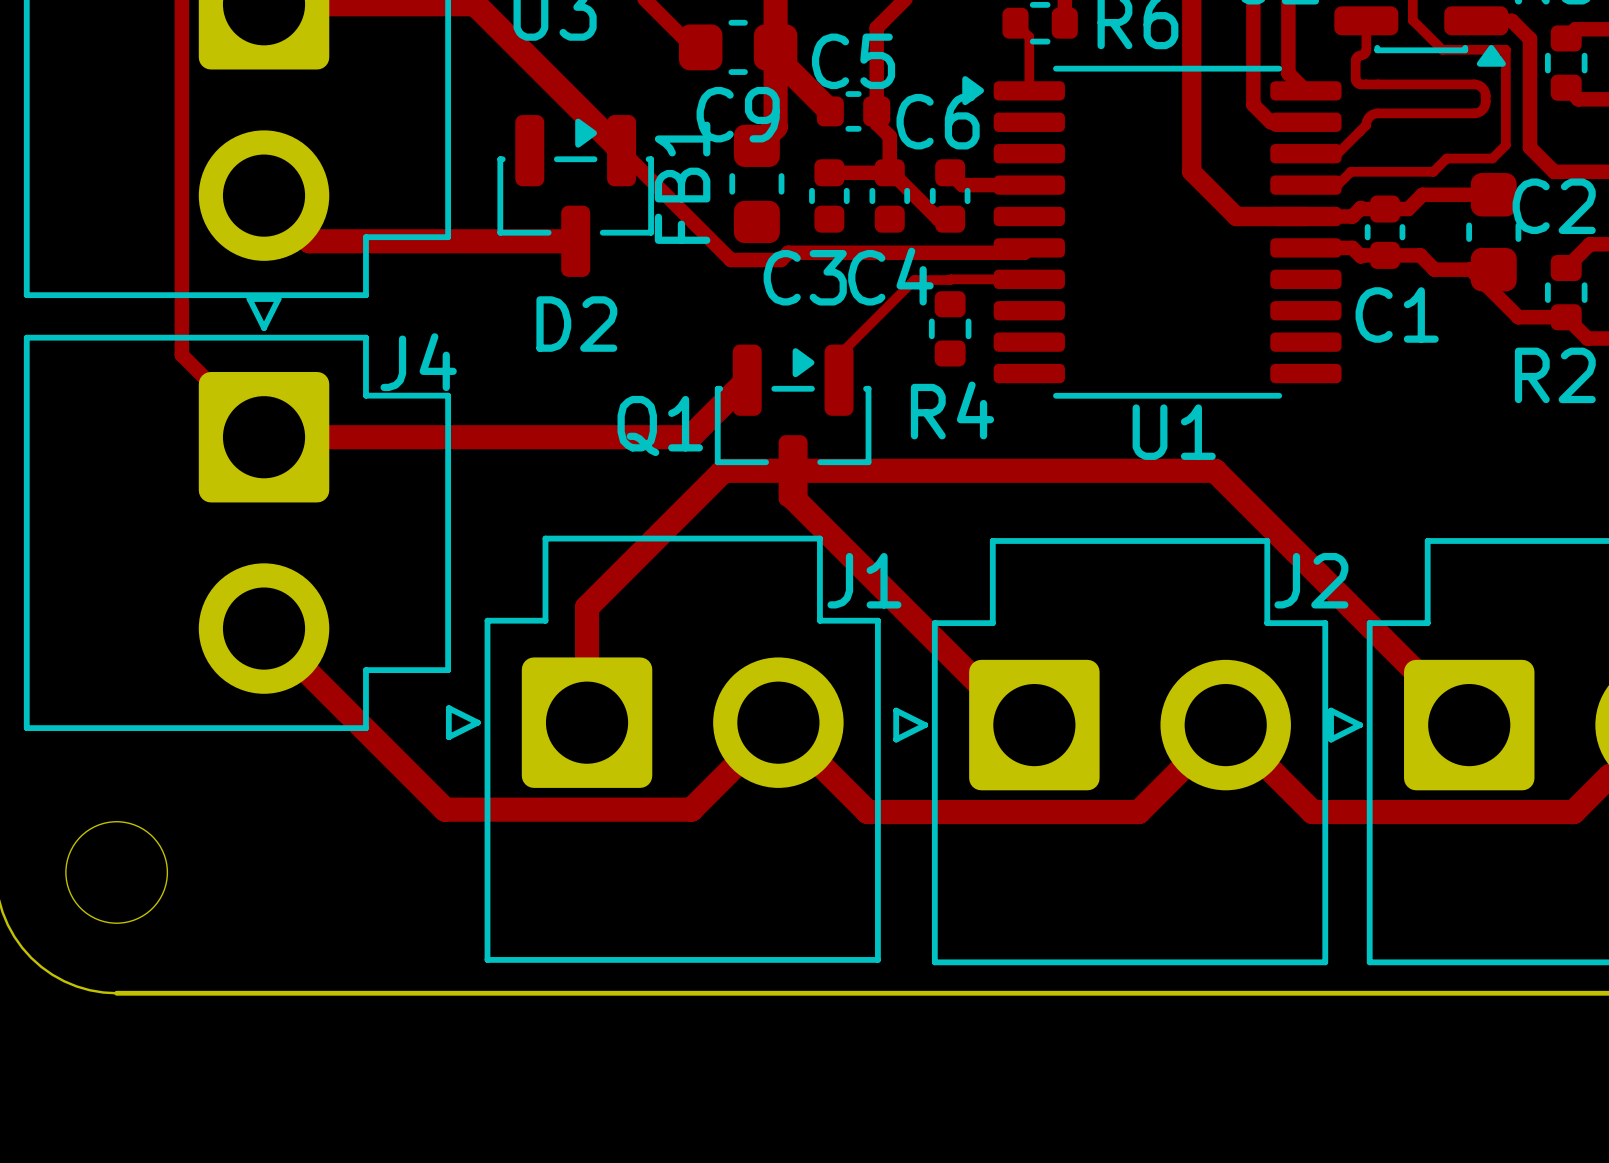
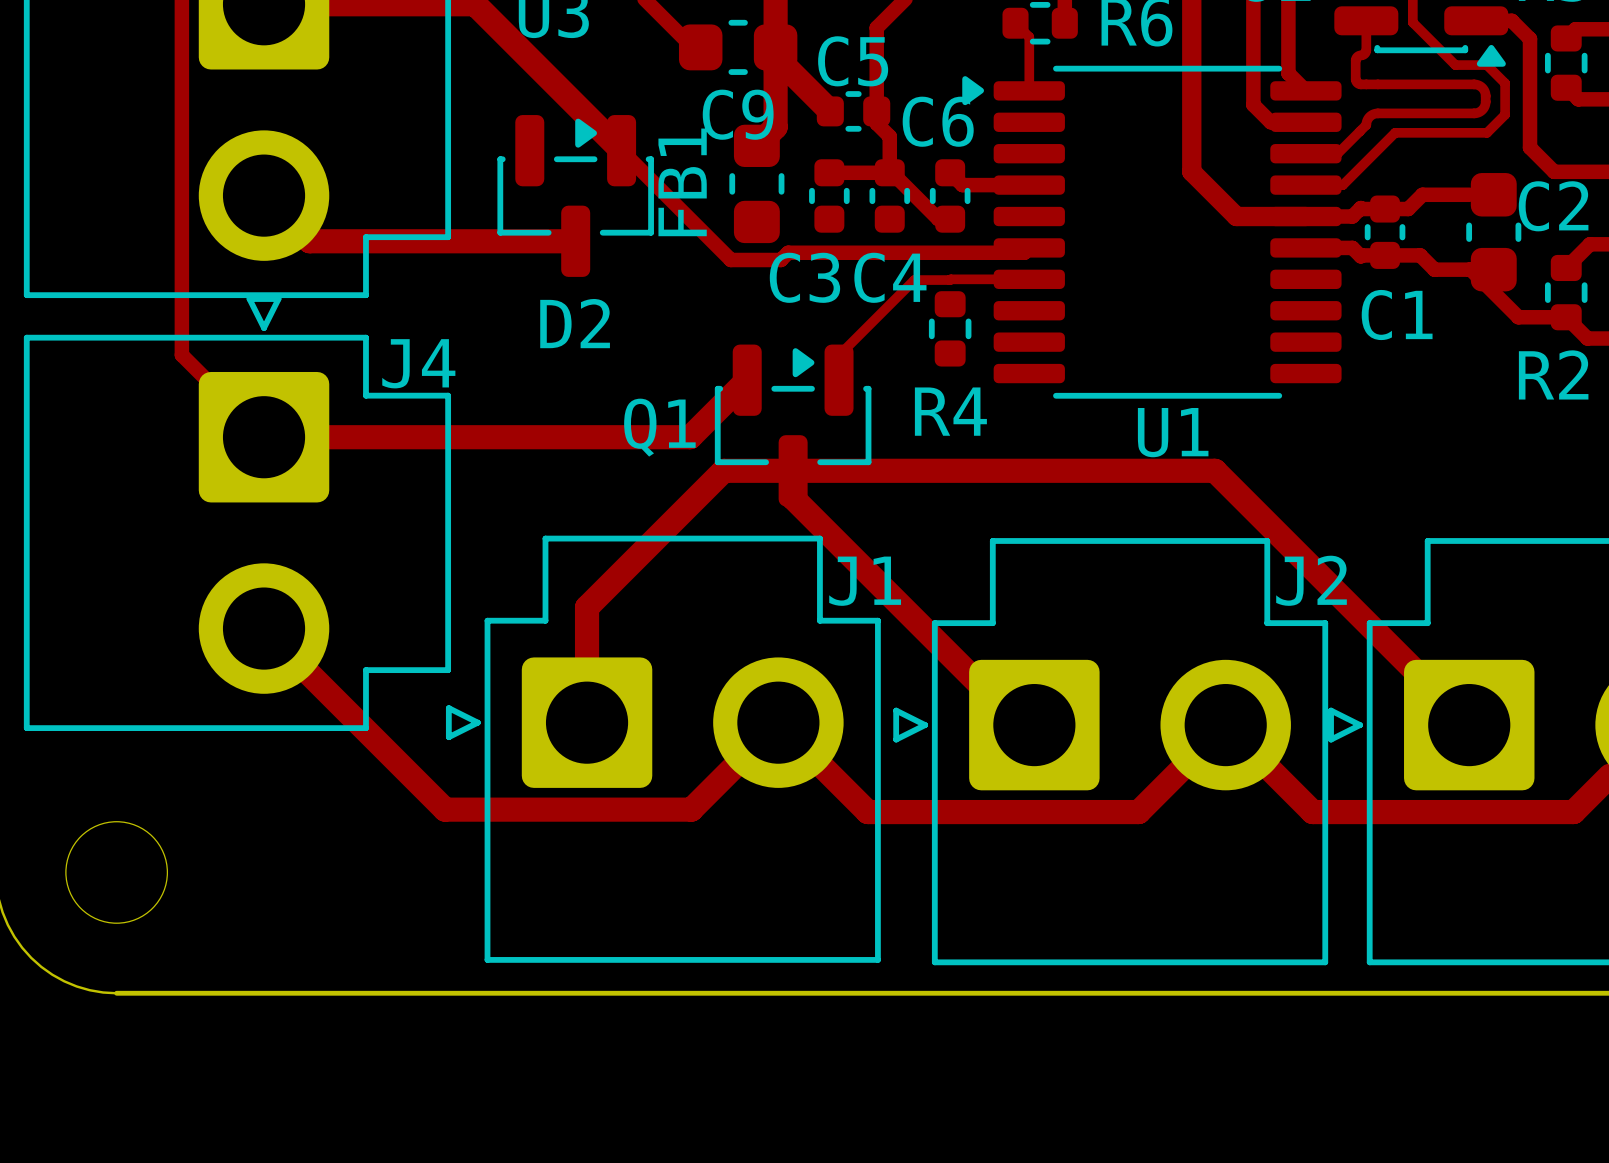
track: (1412, 20) (1442, 49) (1505, 49) (1505, 145) (1492, 158) (1446, 158) (1433, 171) (1350, 171) (1337, 185) -> (1412, 20) (1455, 65) (1486, 65) (1505, 83) (1505, 114) (1487, 132) (1395, 132) (1342, 185) (1337, 185)

